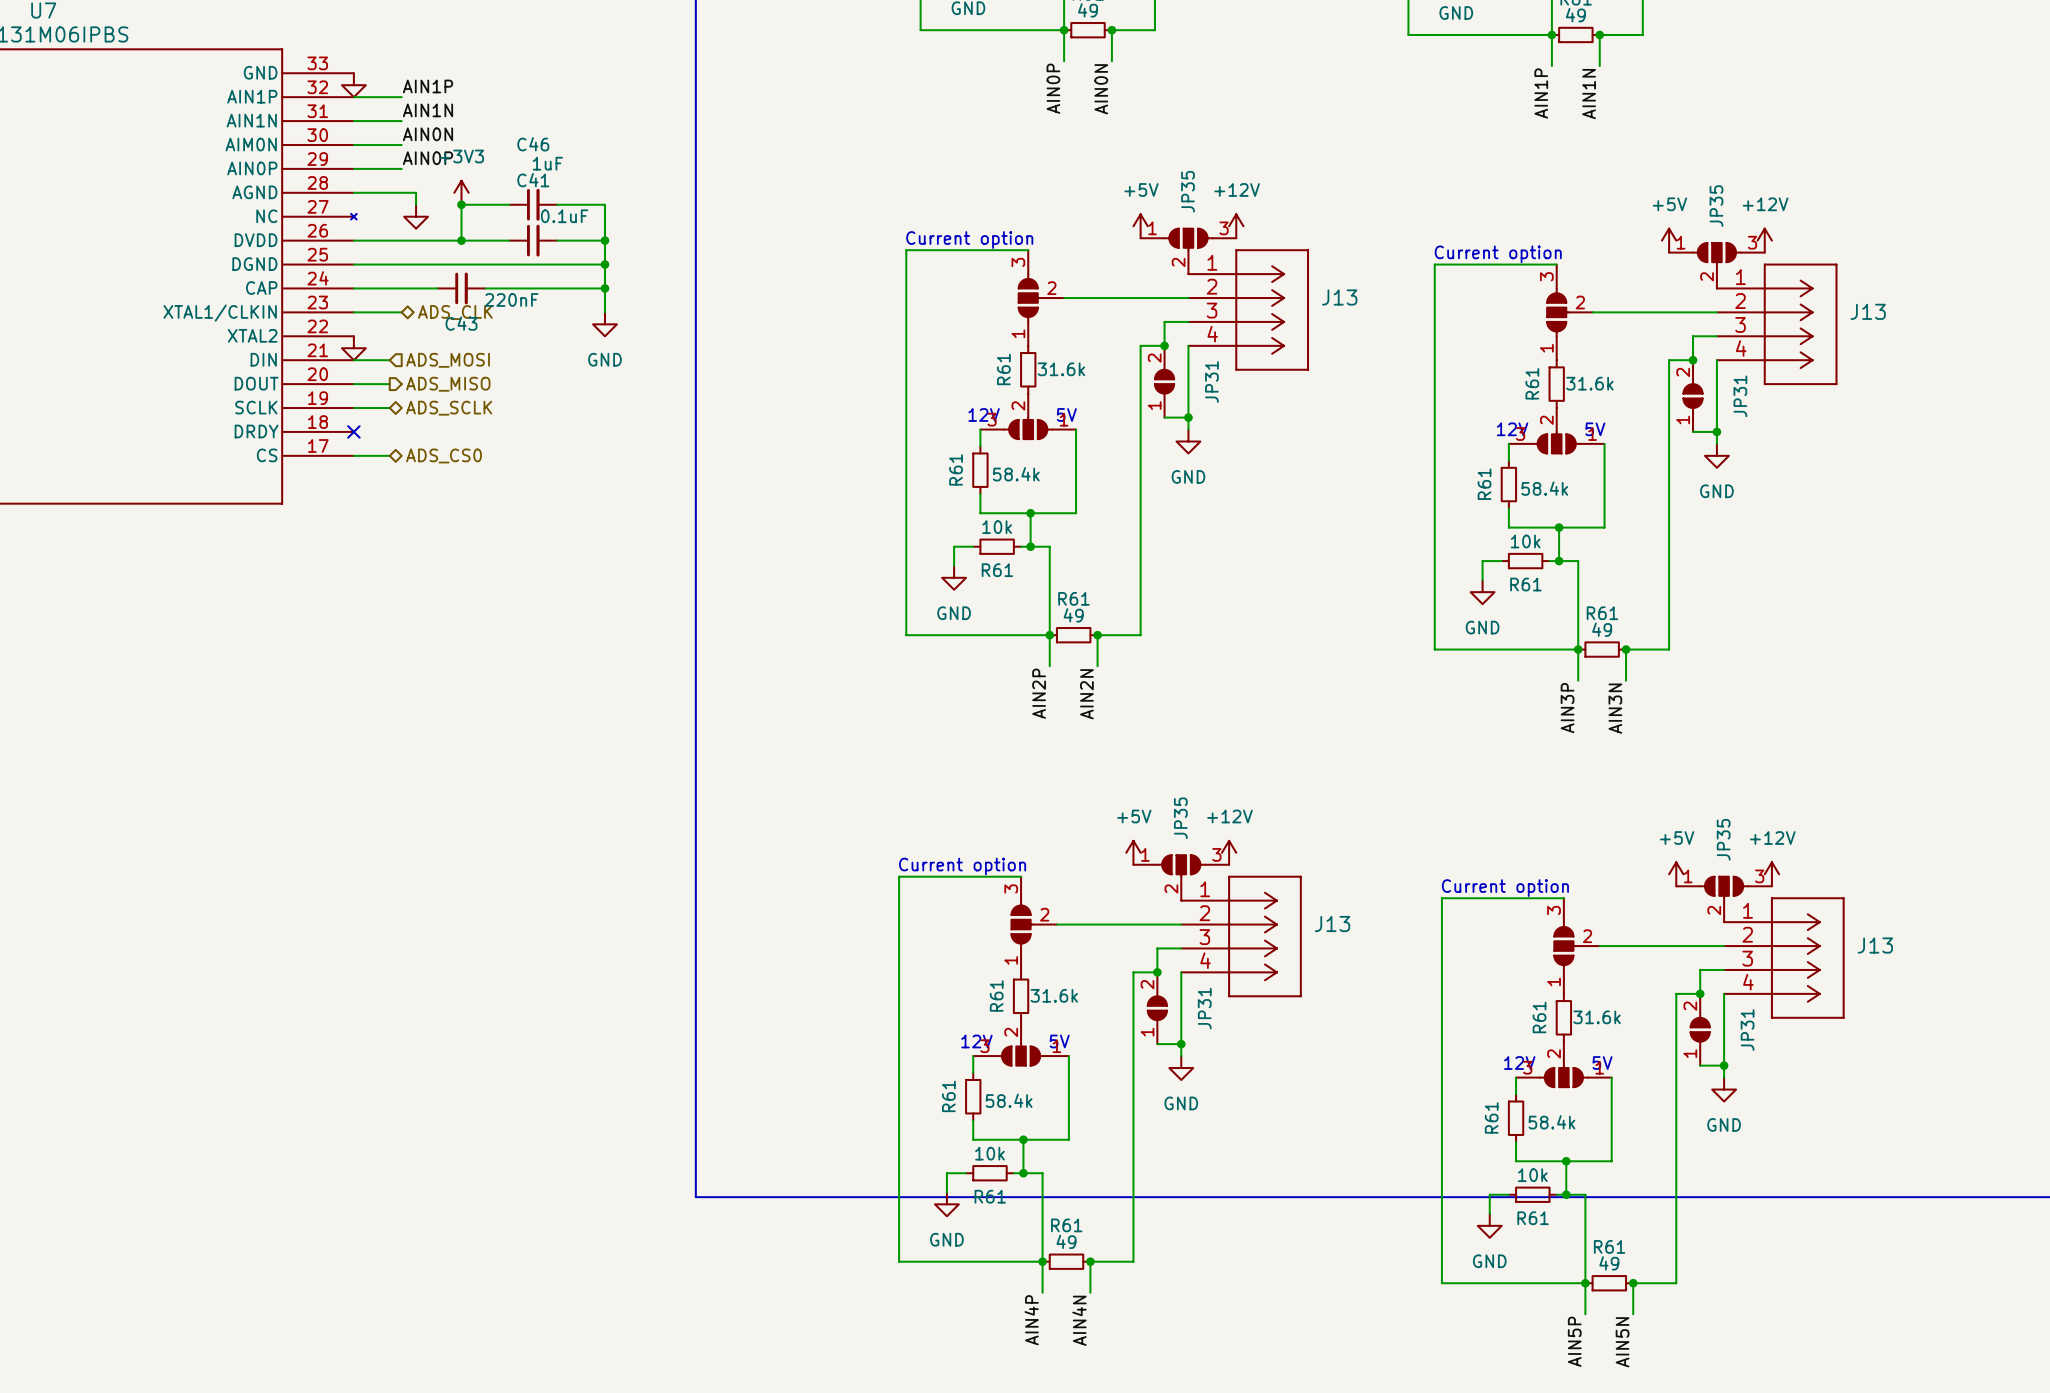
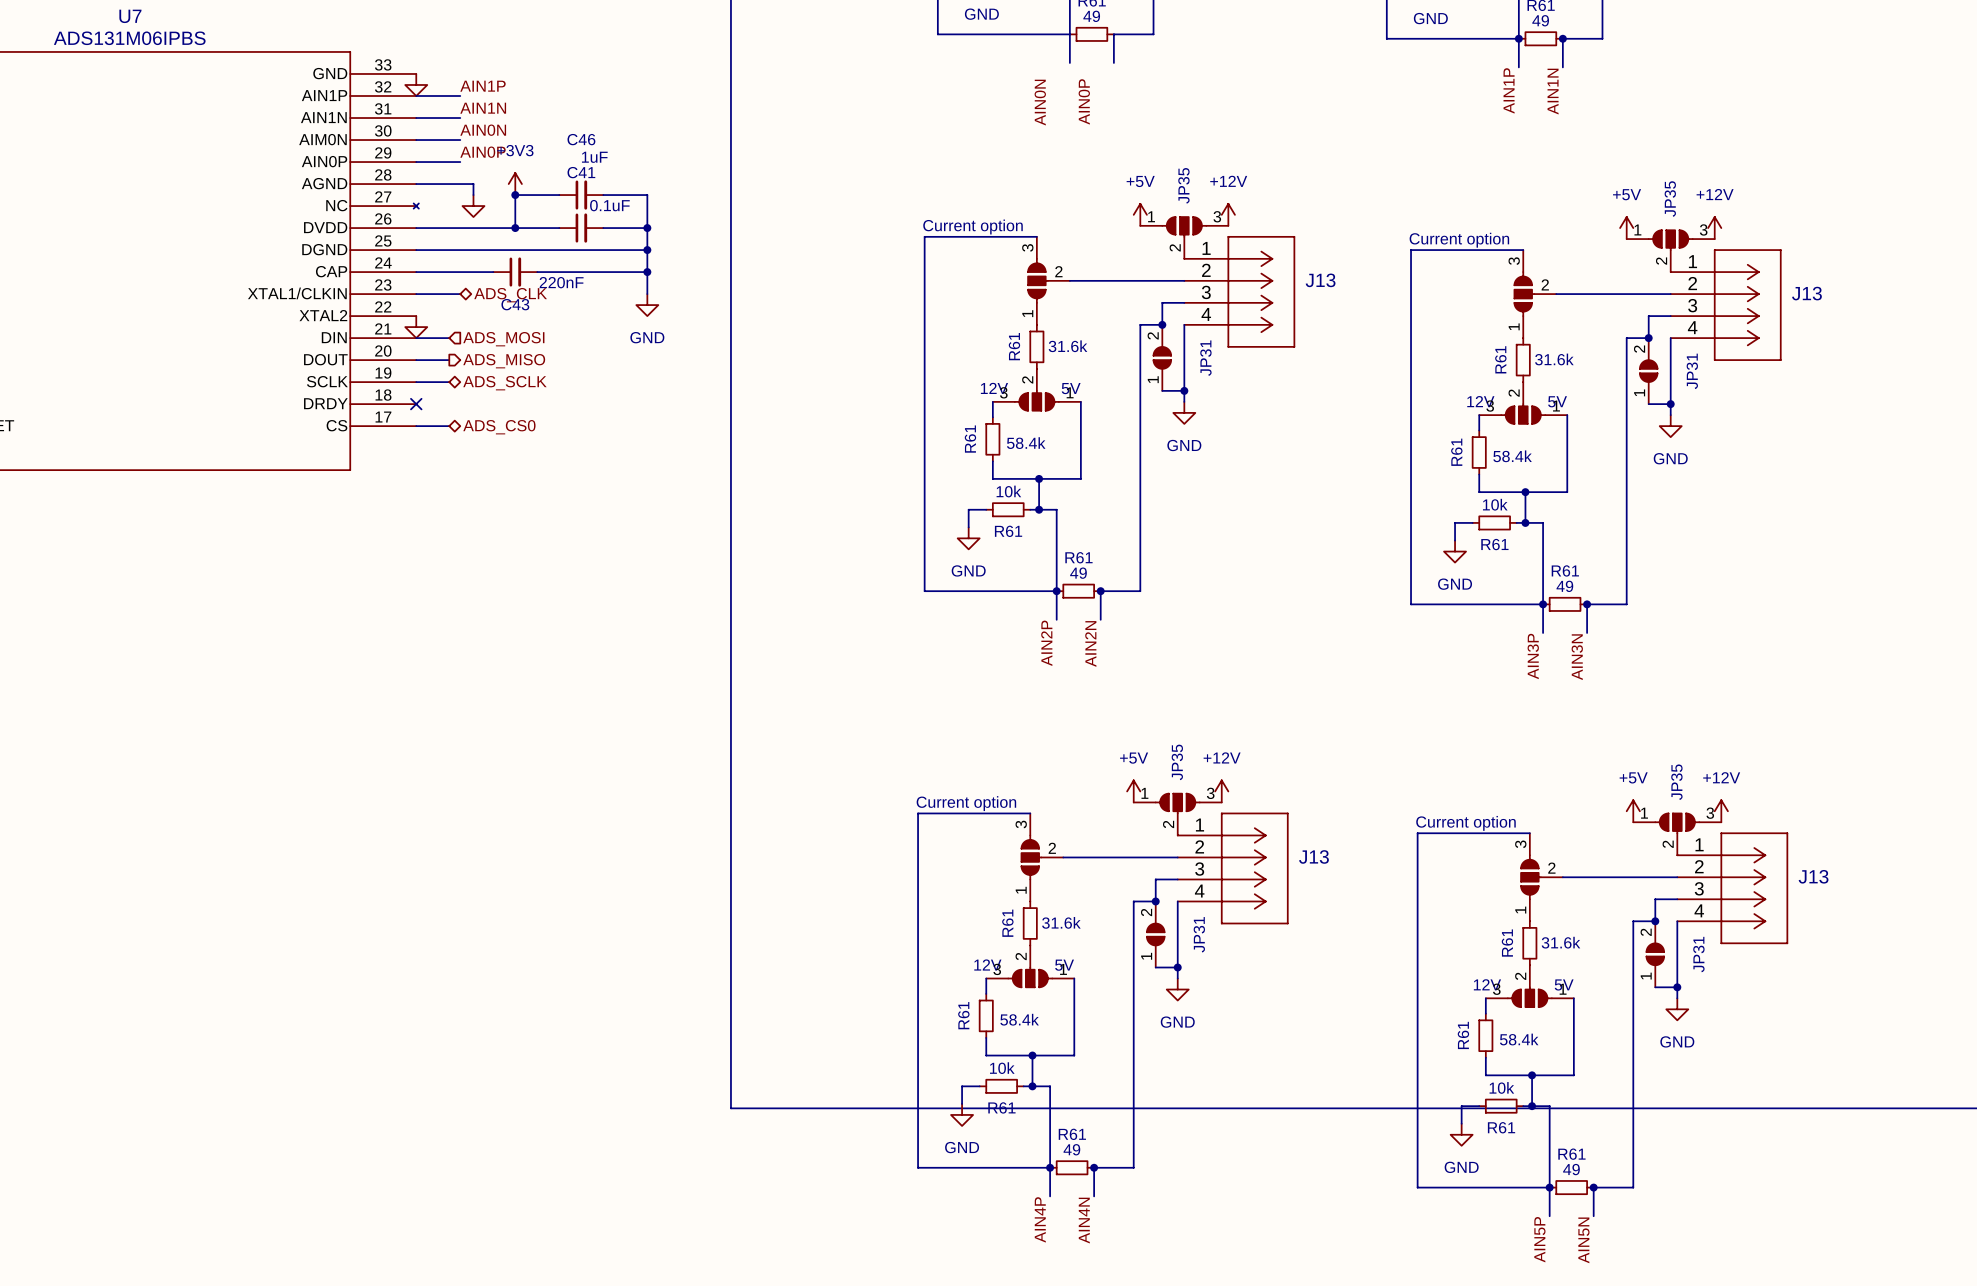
junction: (1064, 30) -> none
junction: (1111, 30) -> none
label position: AIN0P (1053, 88) -> AIN0P (1084, 101)
label position: AIN0N (1101, 89) -> AIN0N (1040, 102)

